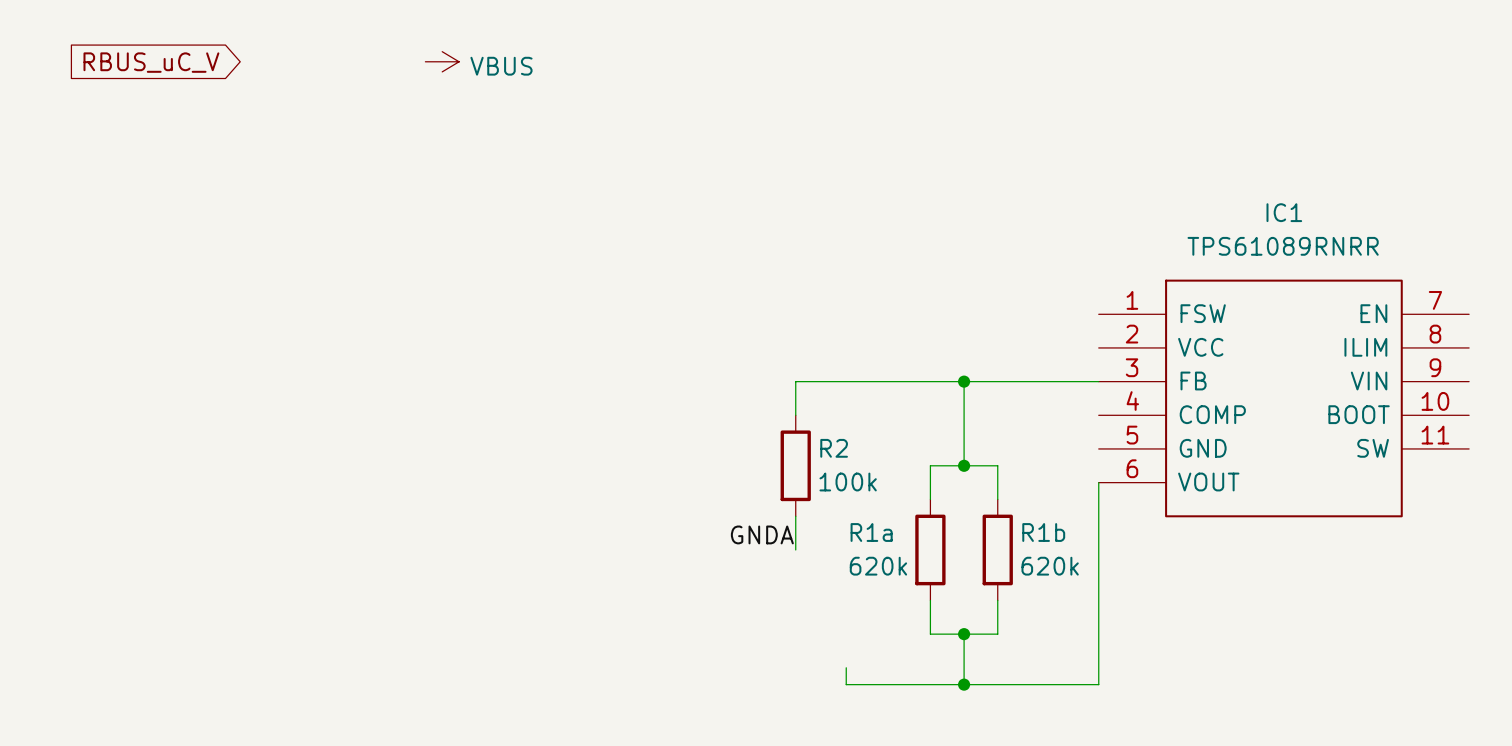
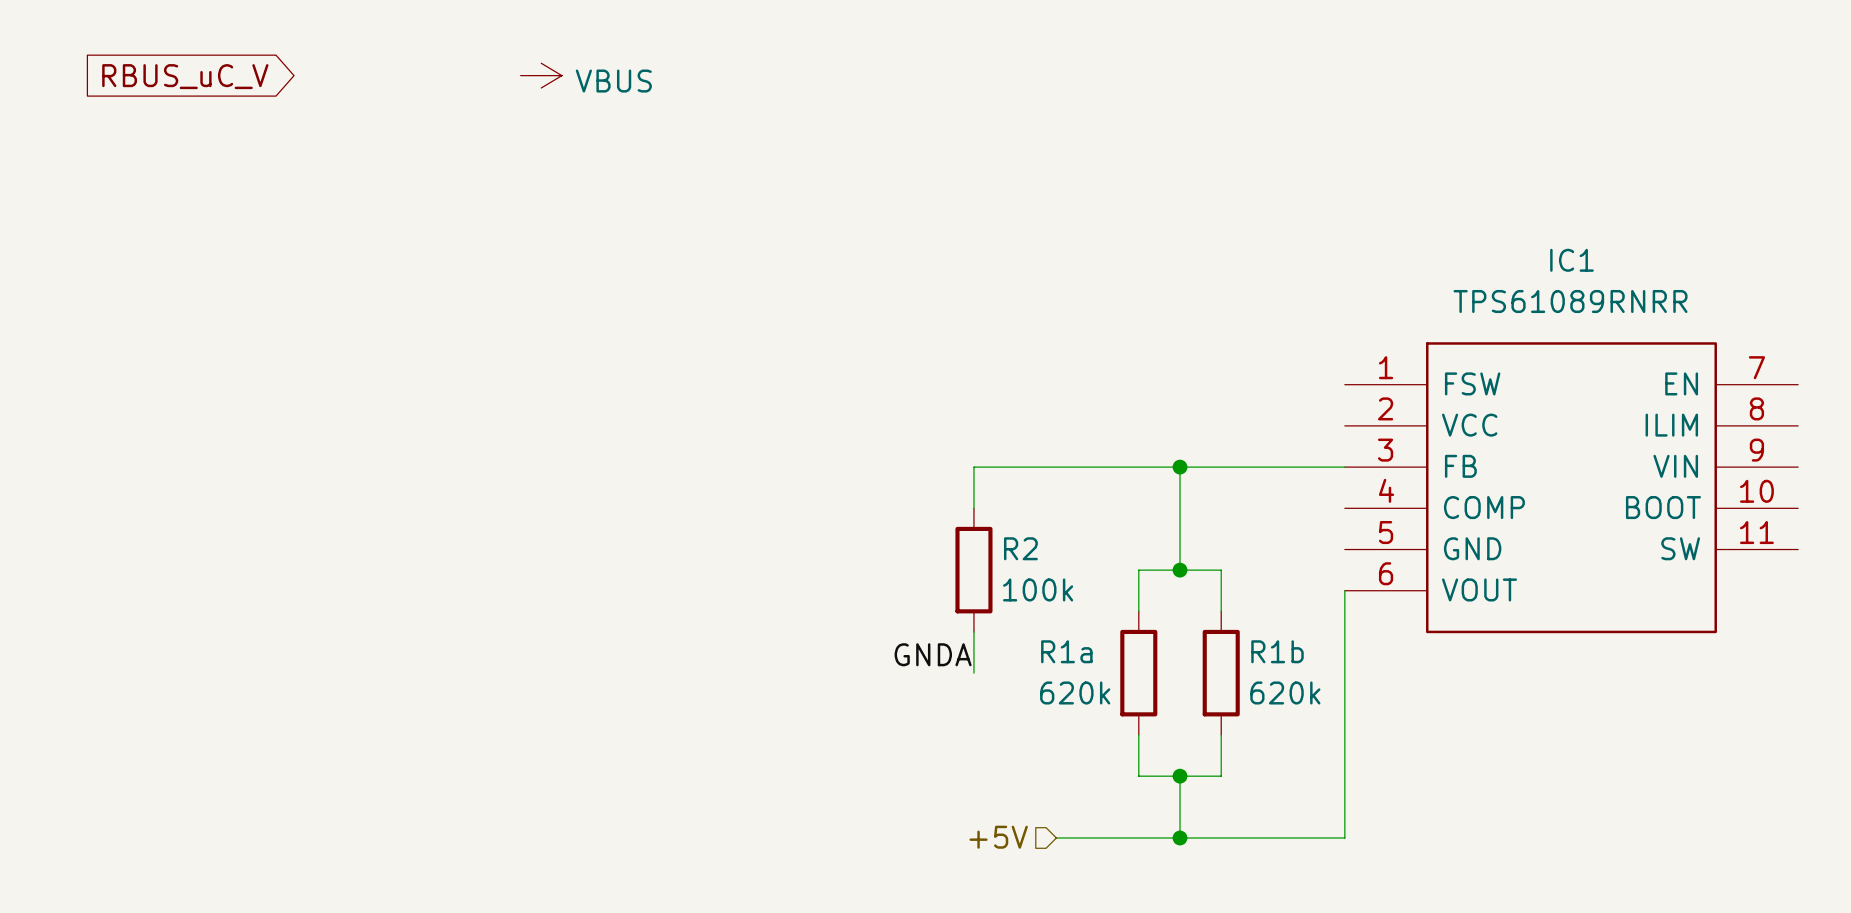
wire: (846, 667) (846, 684) (863, 684) -> none
hierarchical label: none -> +5V (998, 837)

